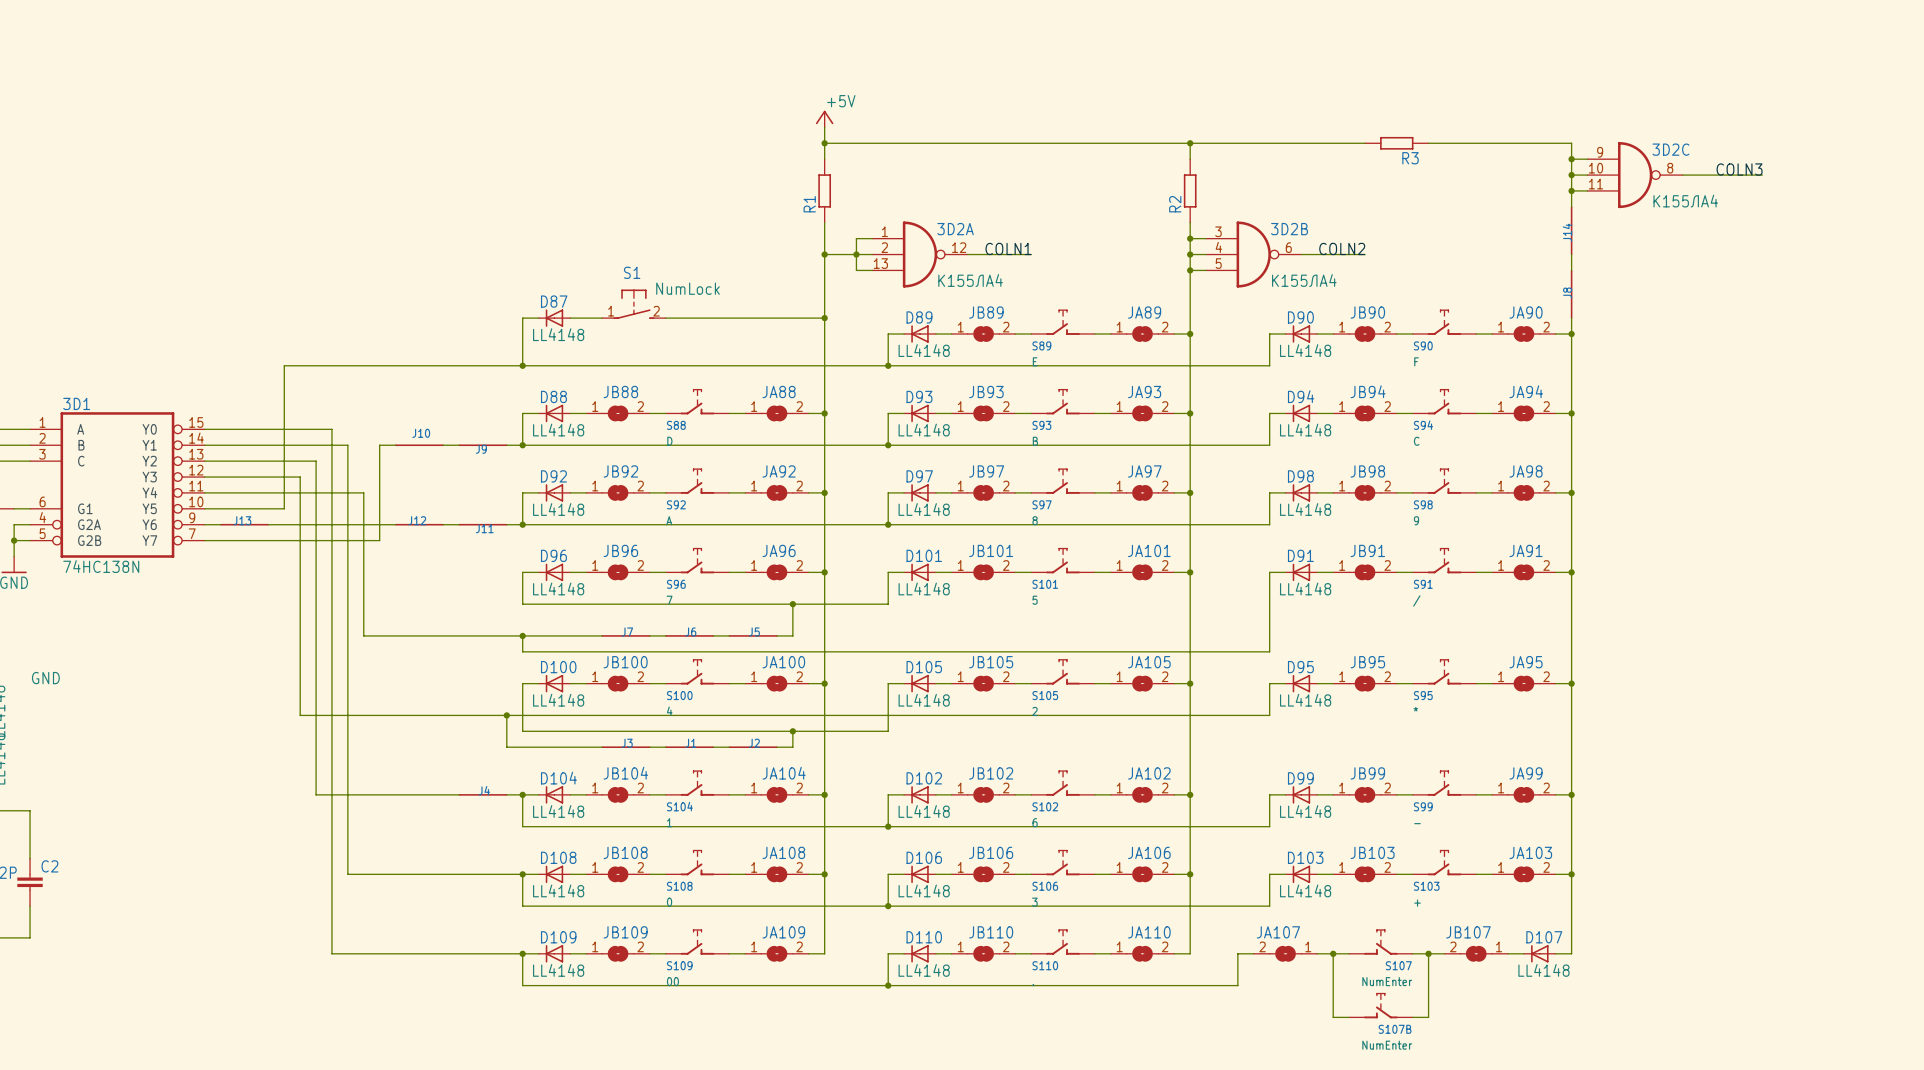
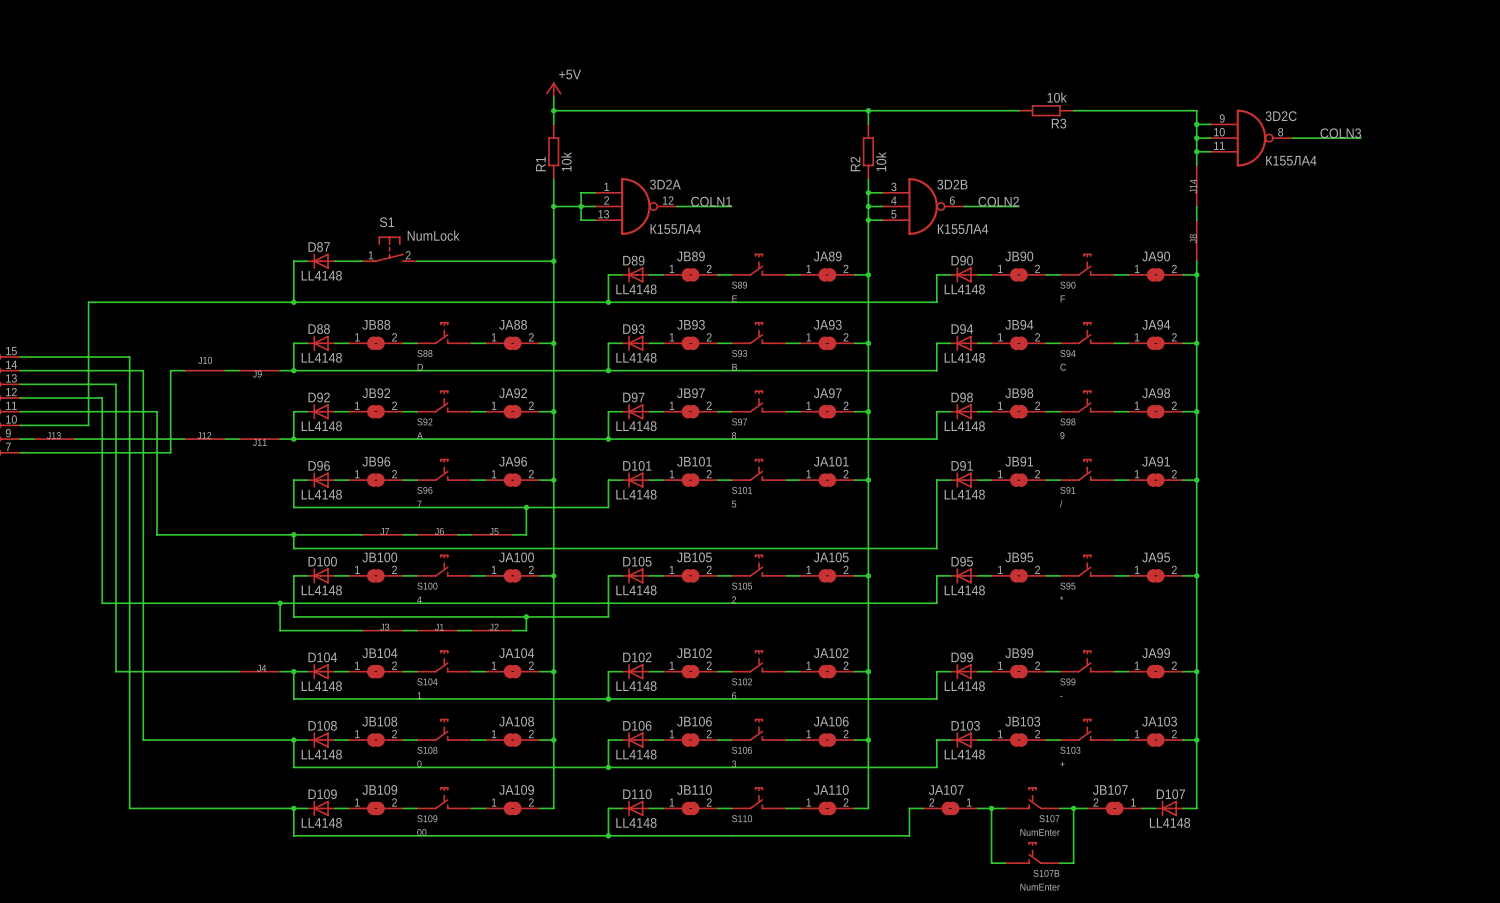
R3 value: none -> 10k (1057, 97)
R1 value: none -> 10k (566, 161)
R2 value: none -> 10k (881, 161)

